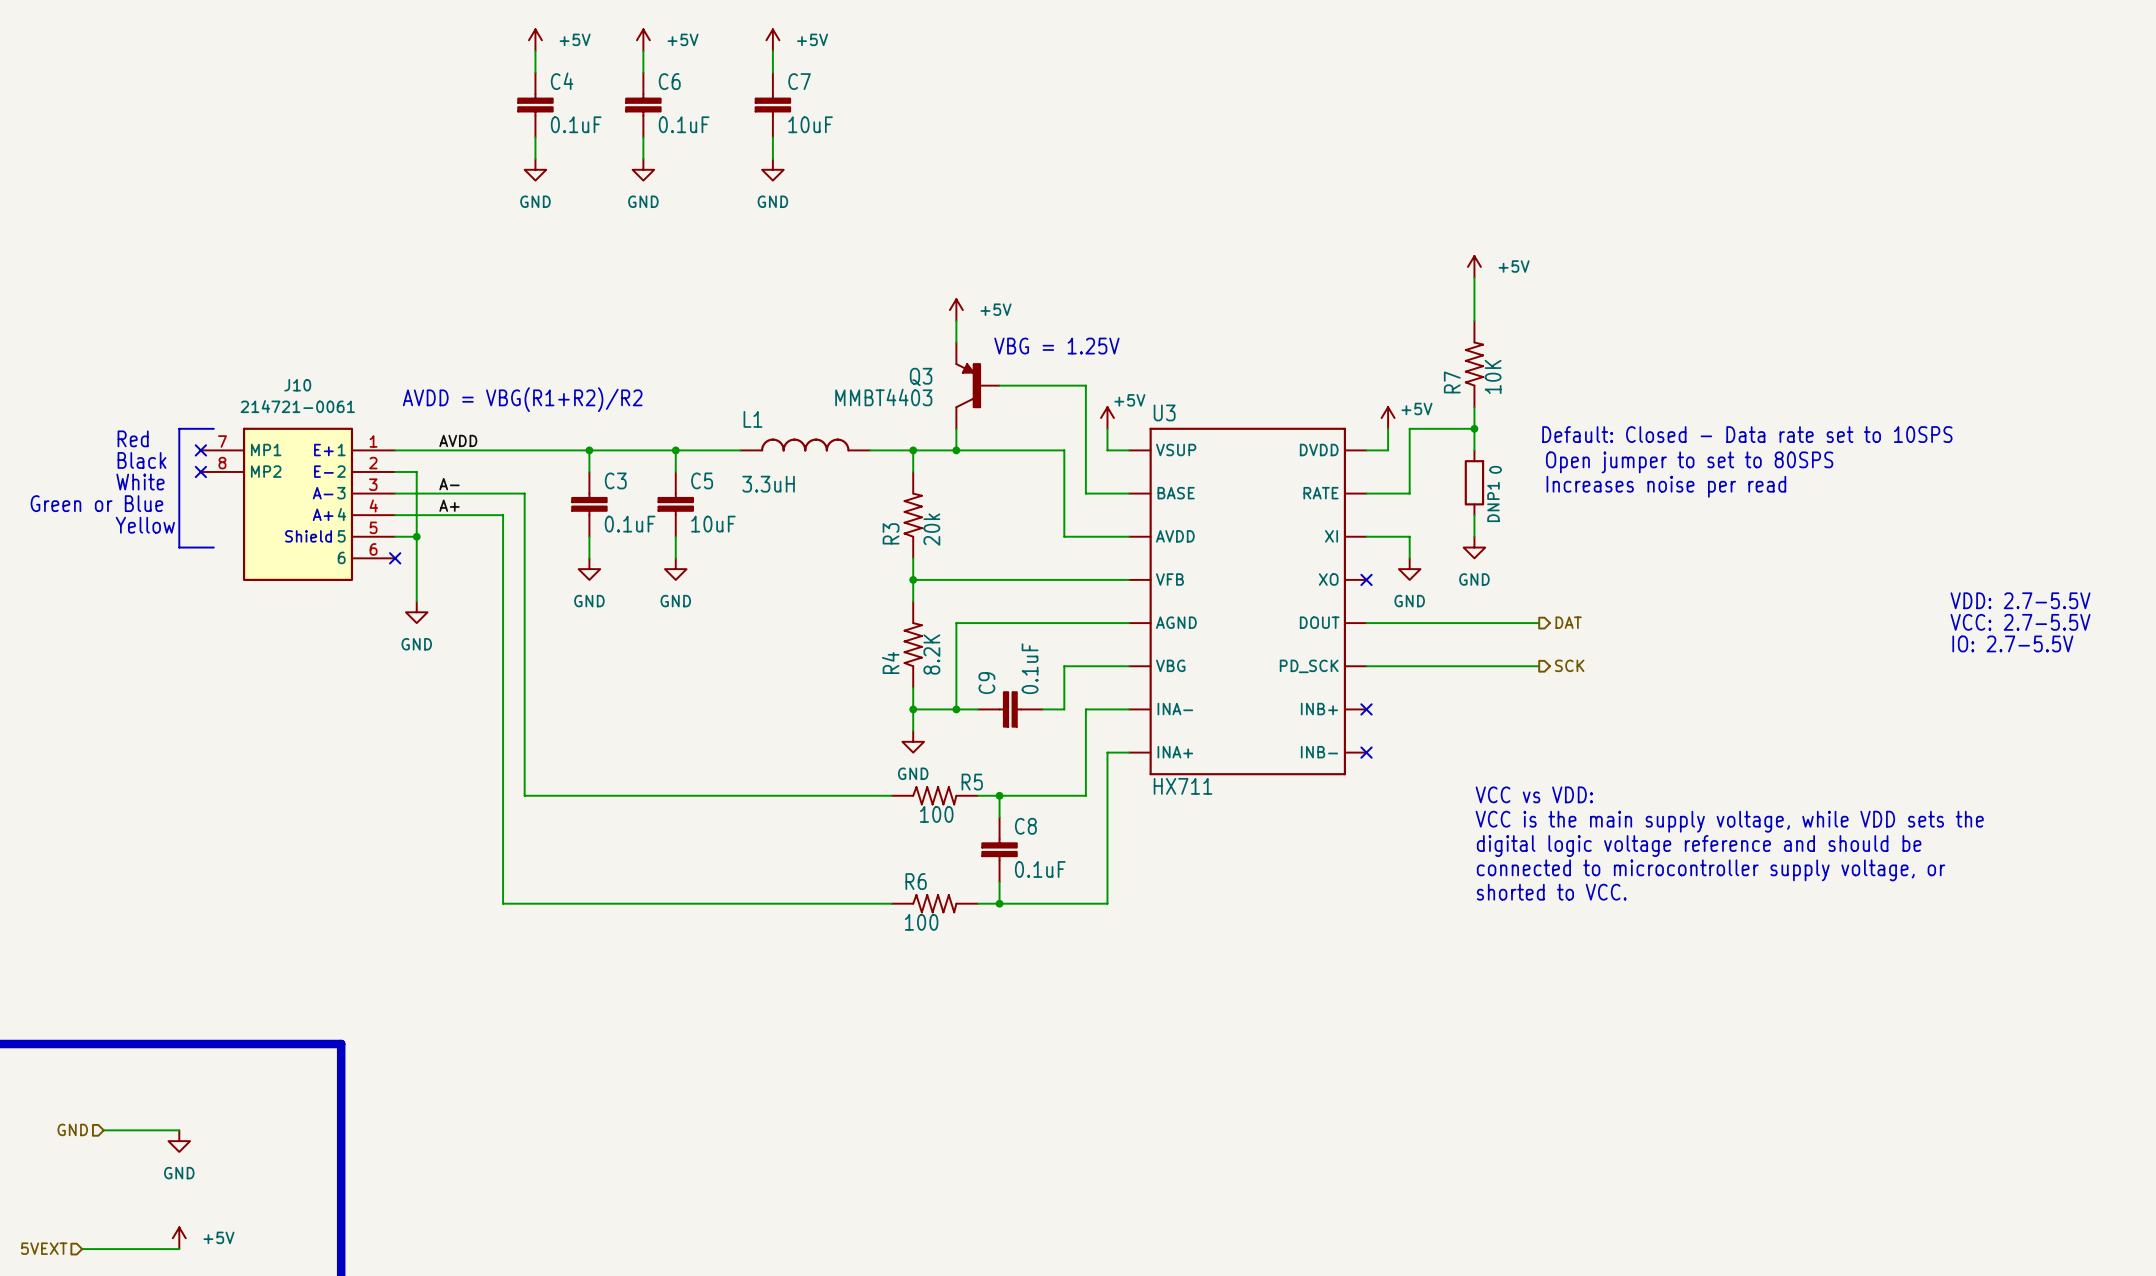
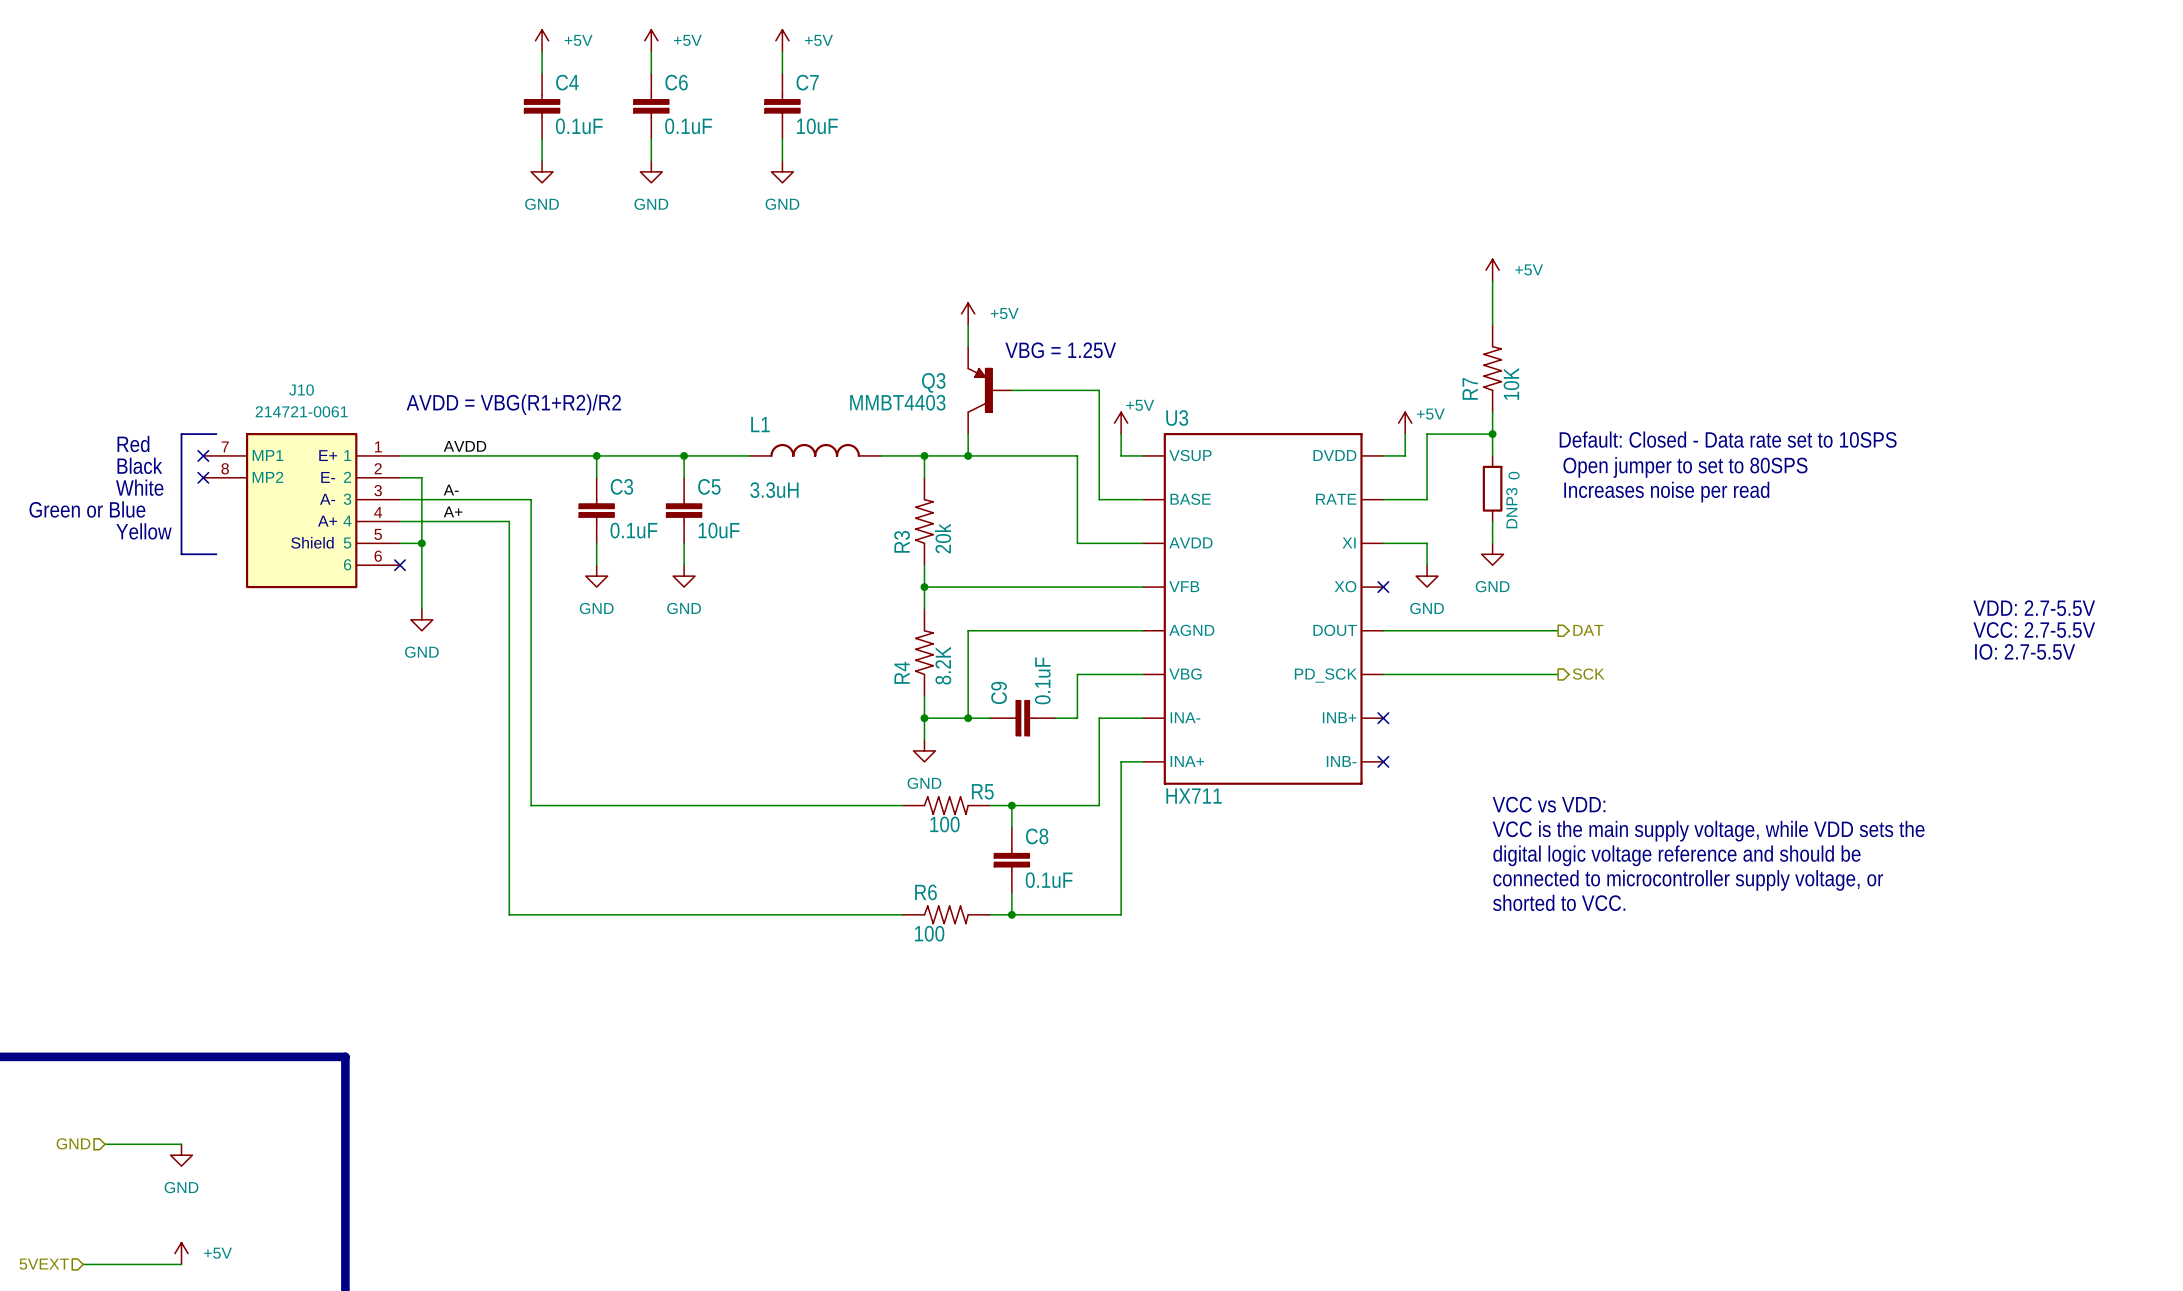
DNP1 name: DNP1 (1493, 501) -> DNP3 (1511, 508)

